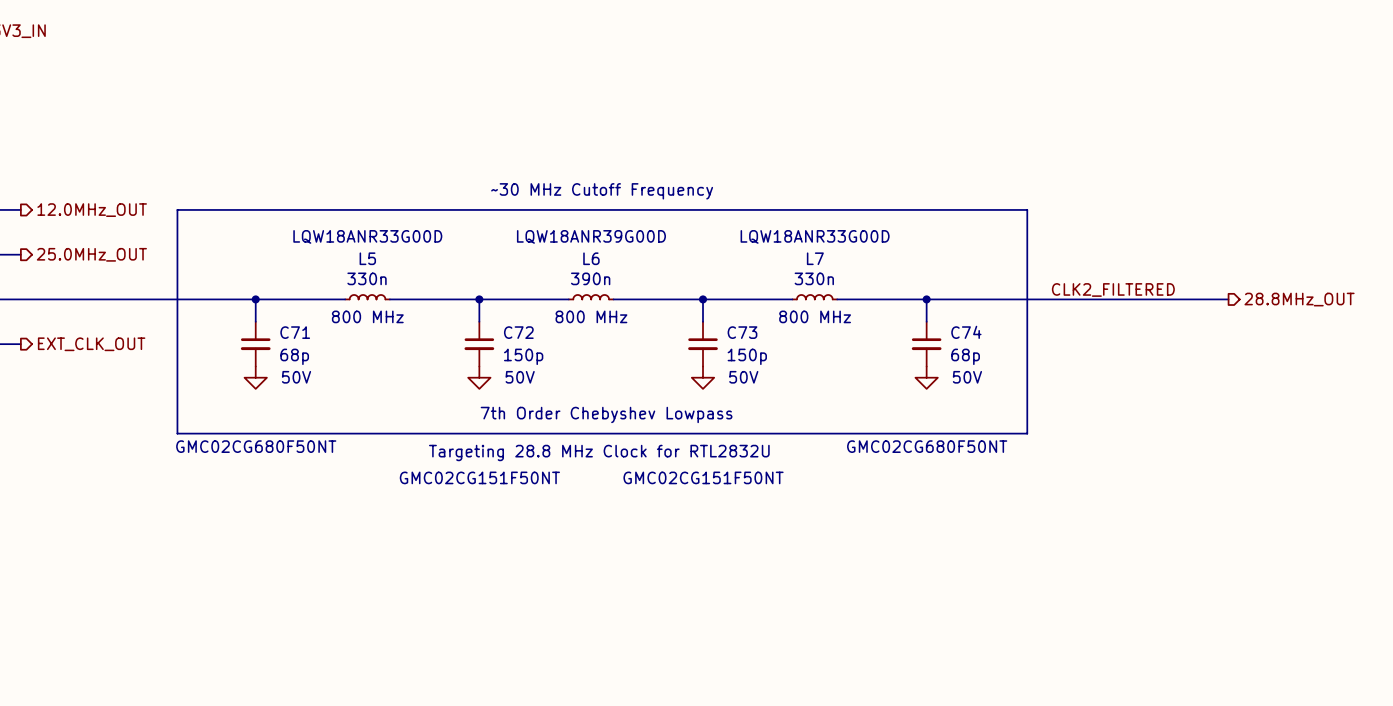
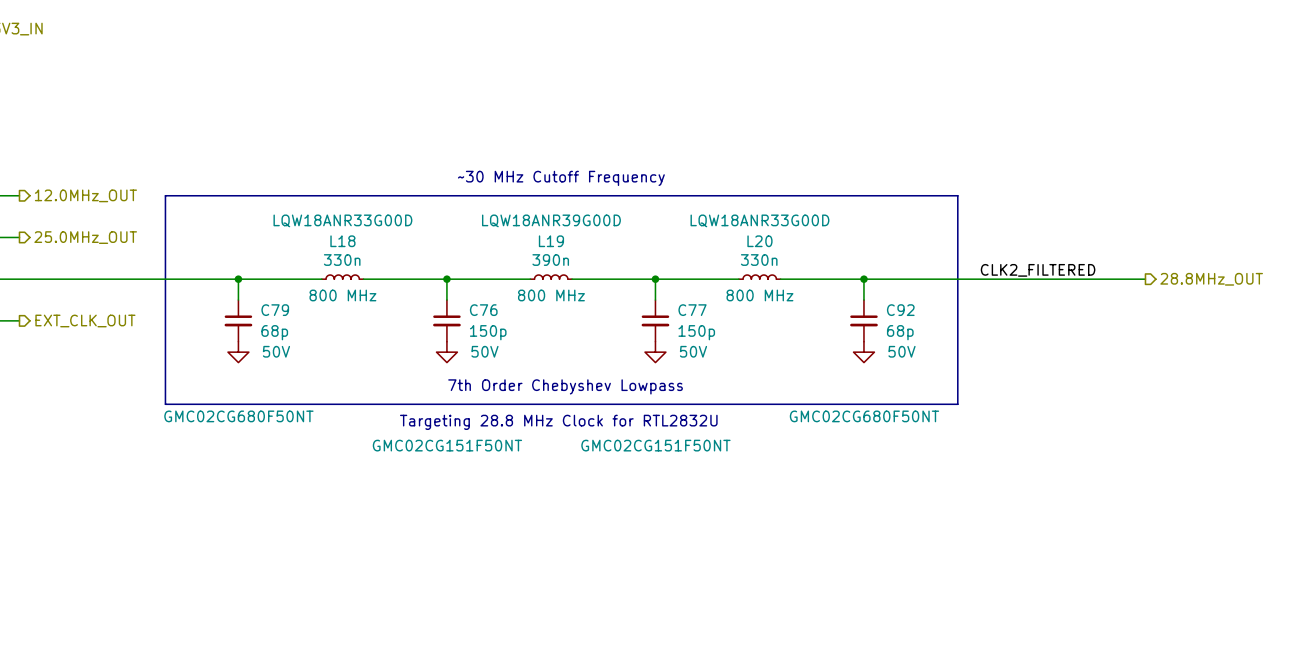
L5 name: L5 (367, 258) -> L18 (342, 241)
L6 name: L6 (591, 258) -> L19 (551, 241)
L7 name: L7 (815, 258) -> L20 (759, 241)
C71 name: C71 (295, 332) -> C79 (275, 310)
C72 name: C72 (518, 332) -> C76 (483, 310)
C73 name: C73 (742, 332) -> C77 (692, 310)
C74 name: C74 (966, 332) -> C92 (900, 310)

